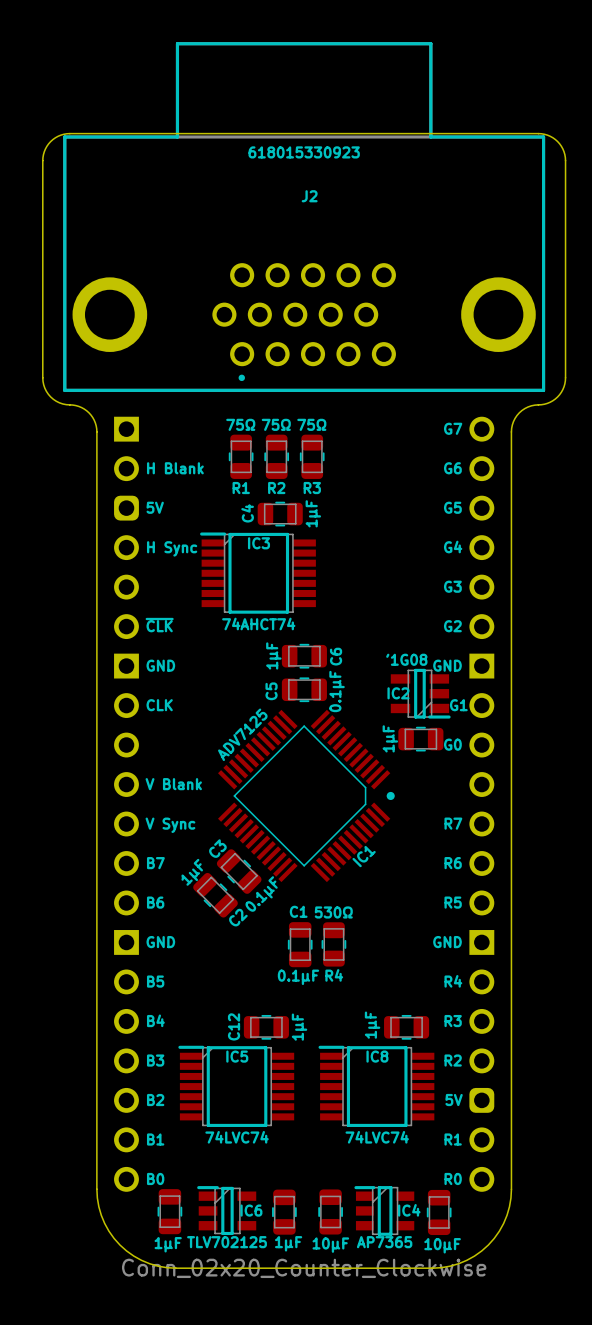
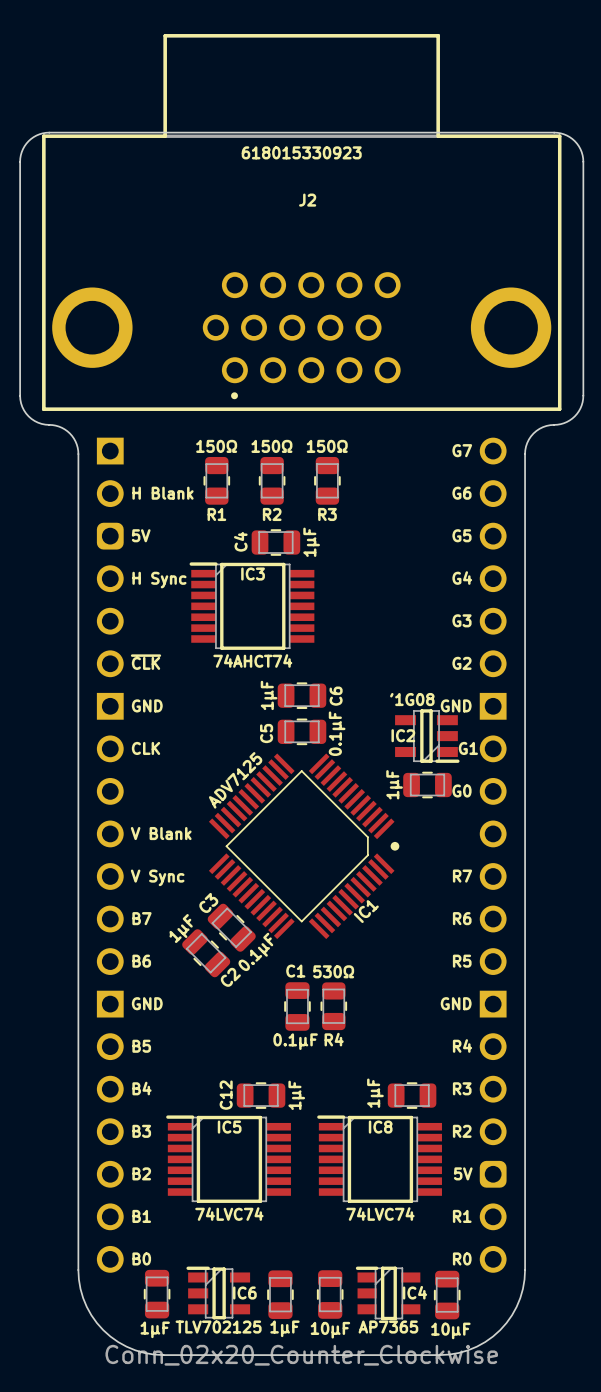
R1 value: 75Ω (240, 424) -> 150Ω (216, 446)
R2 value: 75Ω (276, 424) -> 150Ω (271, 446)
R3 value: 75Ω (311, 424) -> 150Ω (327, 446)
R1 position: (241, 456) -> (216, 480)
R3 position: (312, 456) -> (327, 480)

